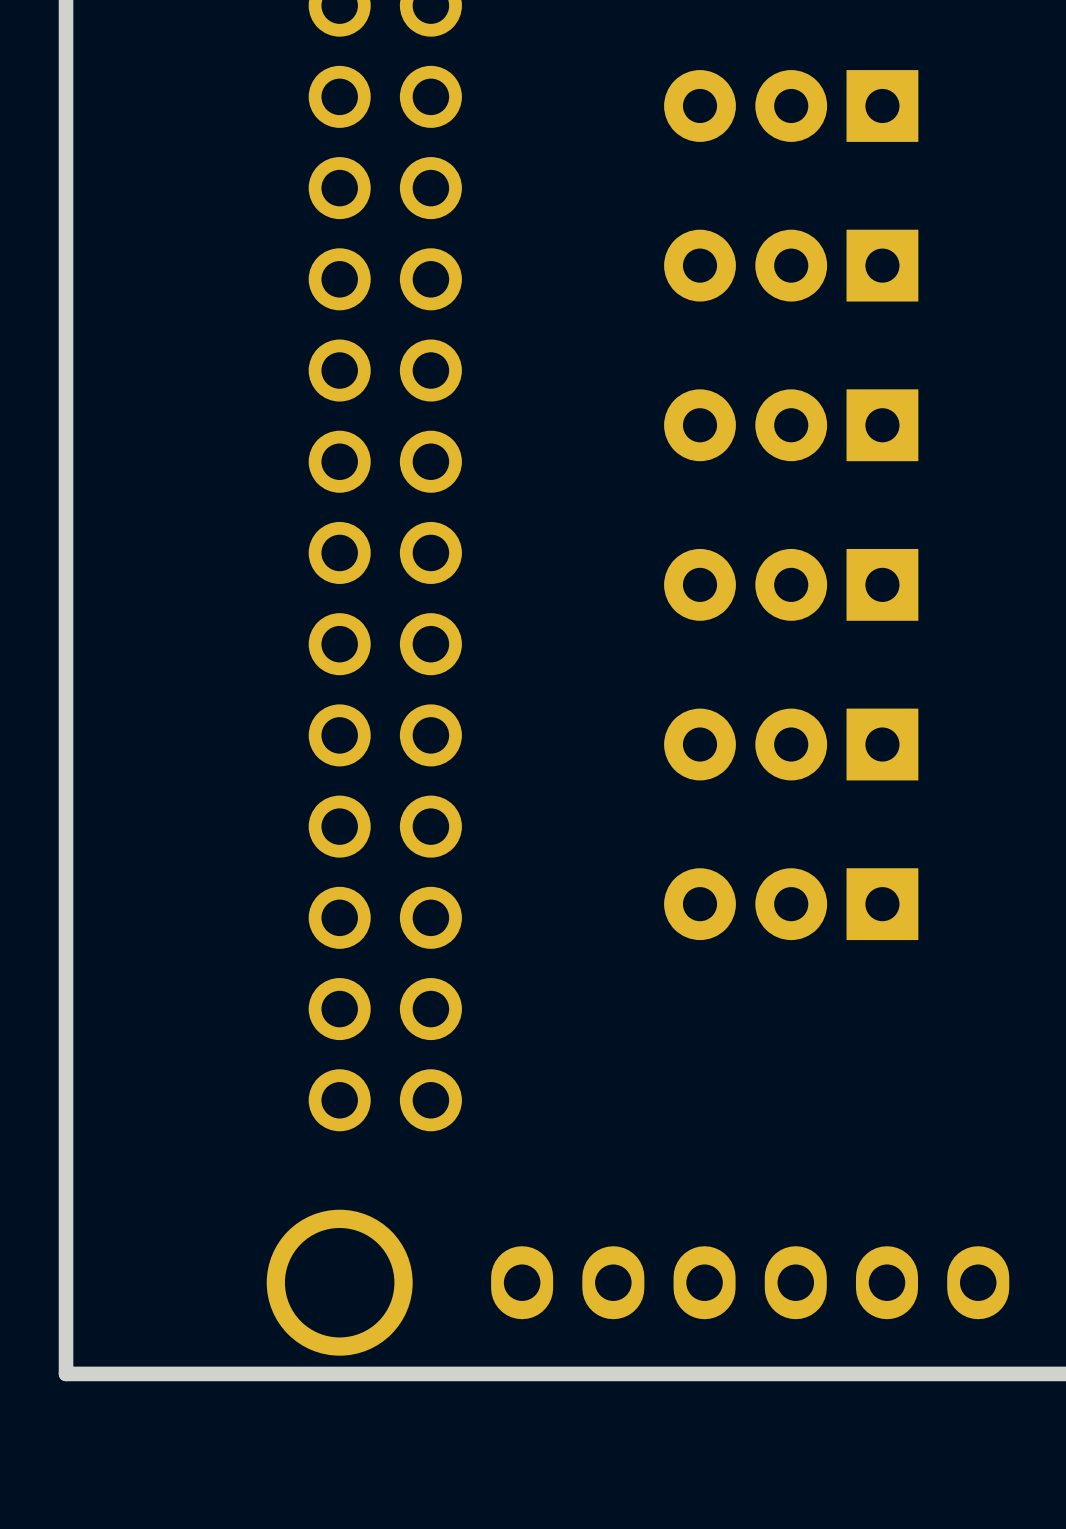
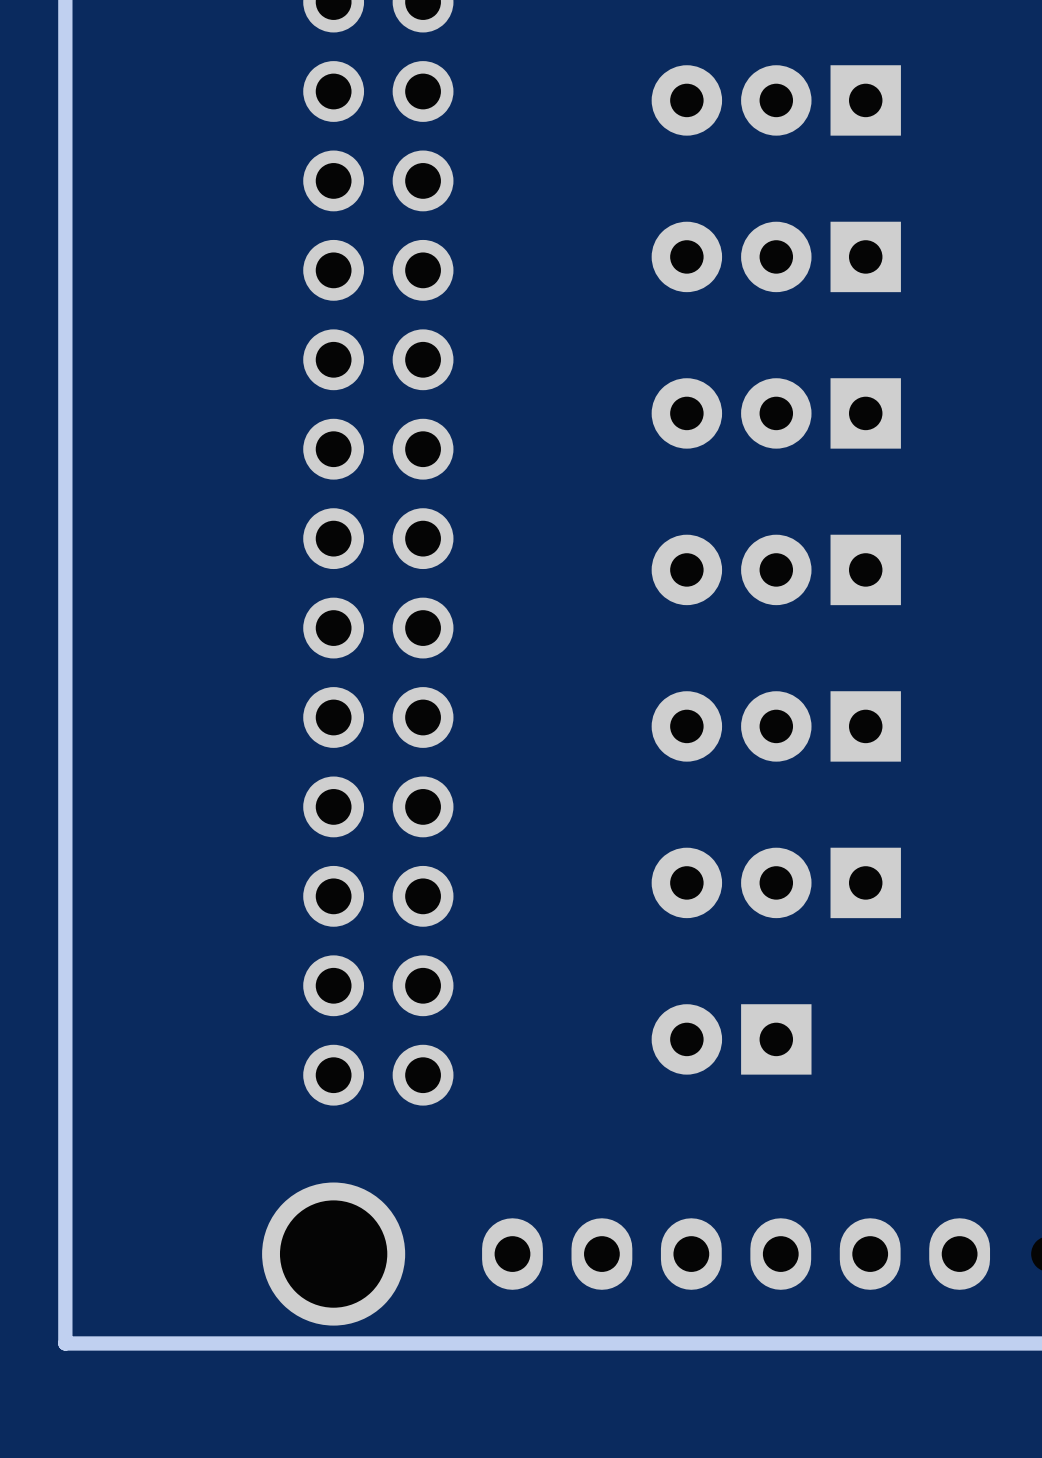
part: none -> (731, 1039)

